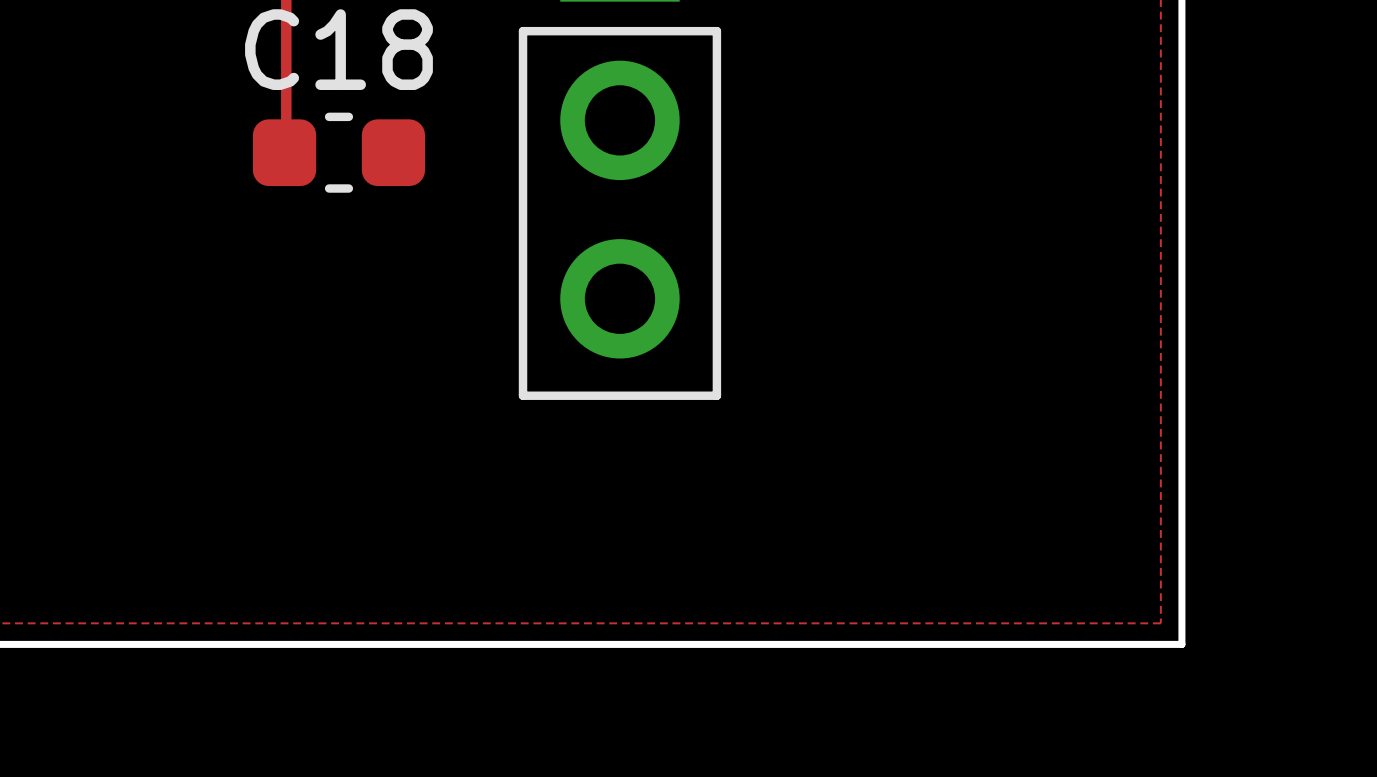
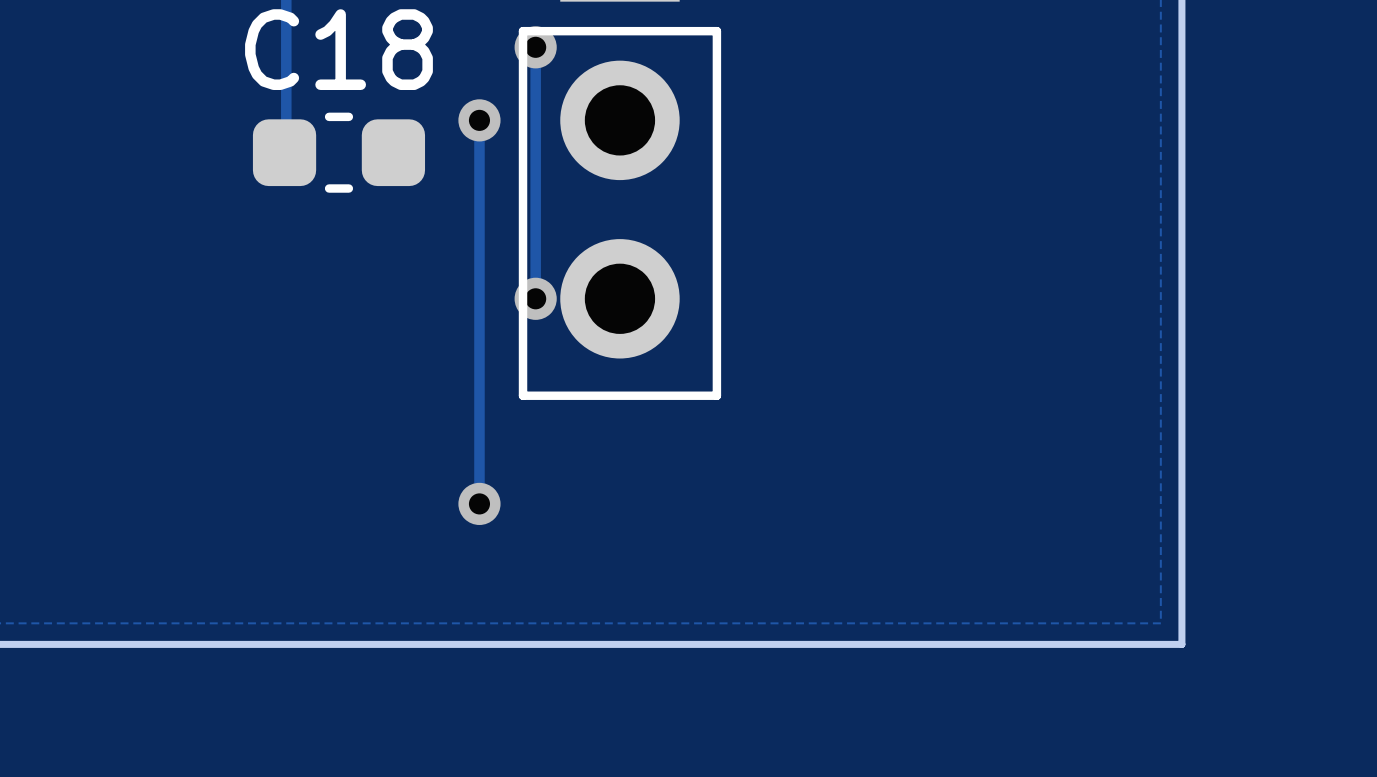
track: none -> (535, 47) (535, 298)
via: none -> (535, 47)
track: none -> (479, 120) (479, 503)
via: none -> (479, 120)
via: none -> (535, 298)
via: none -> (479, 503)

